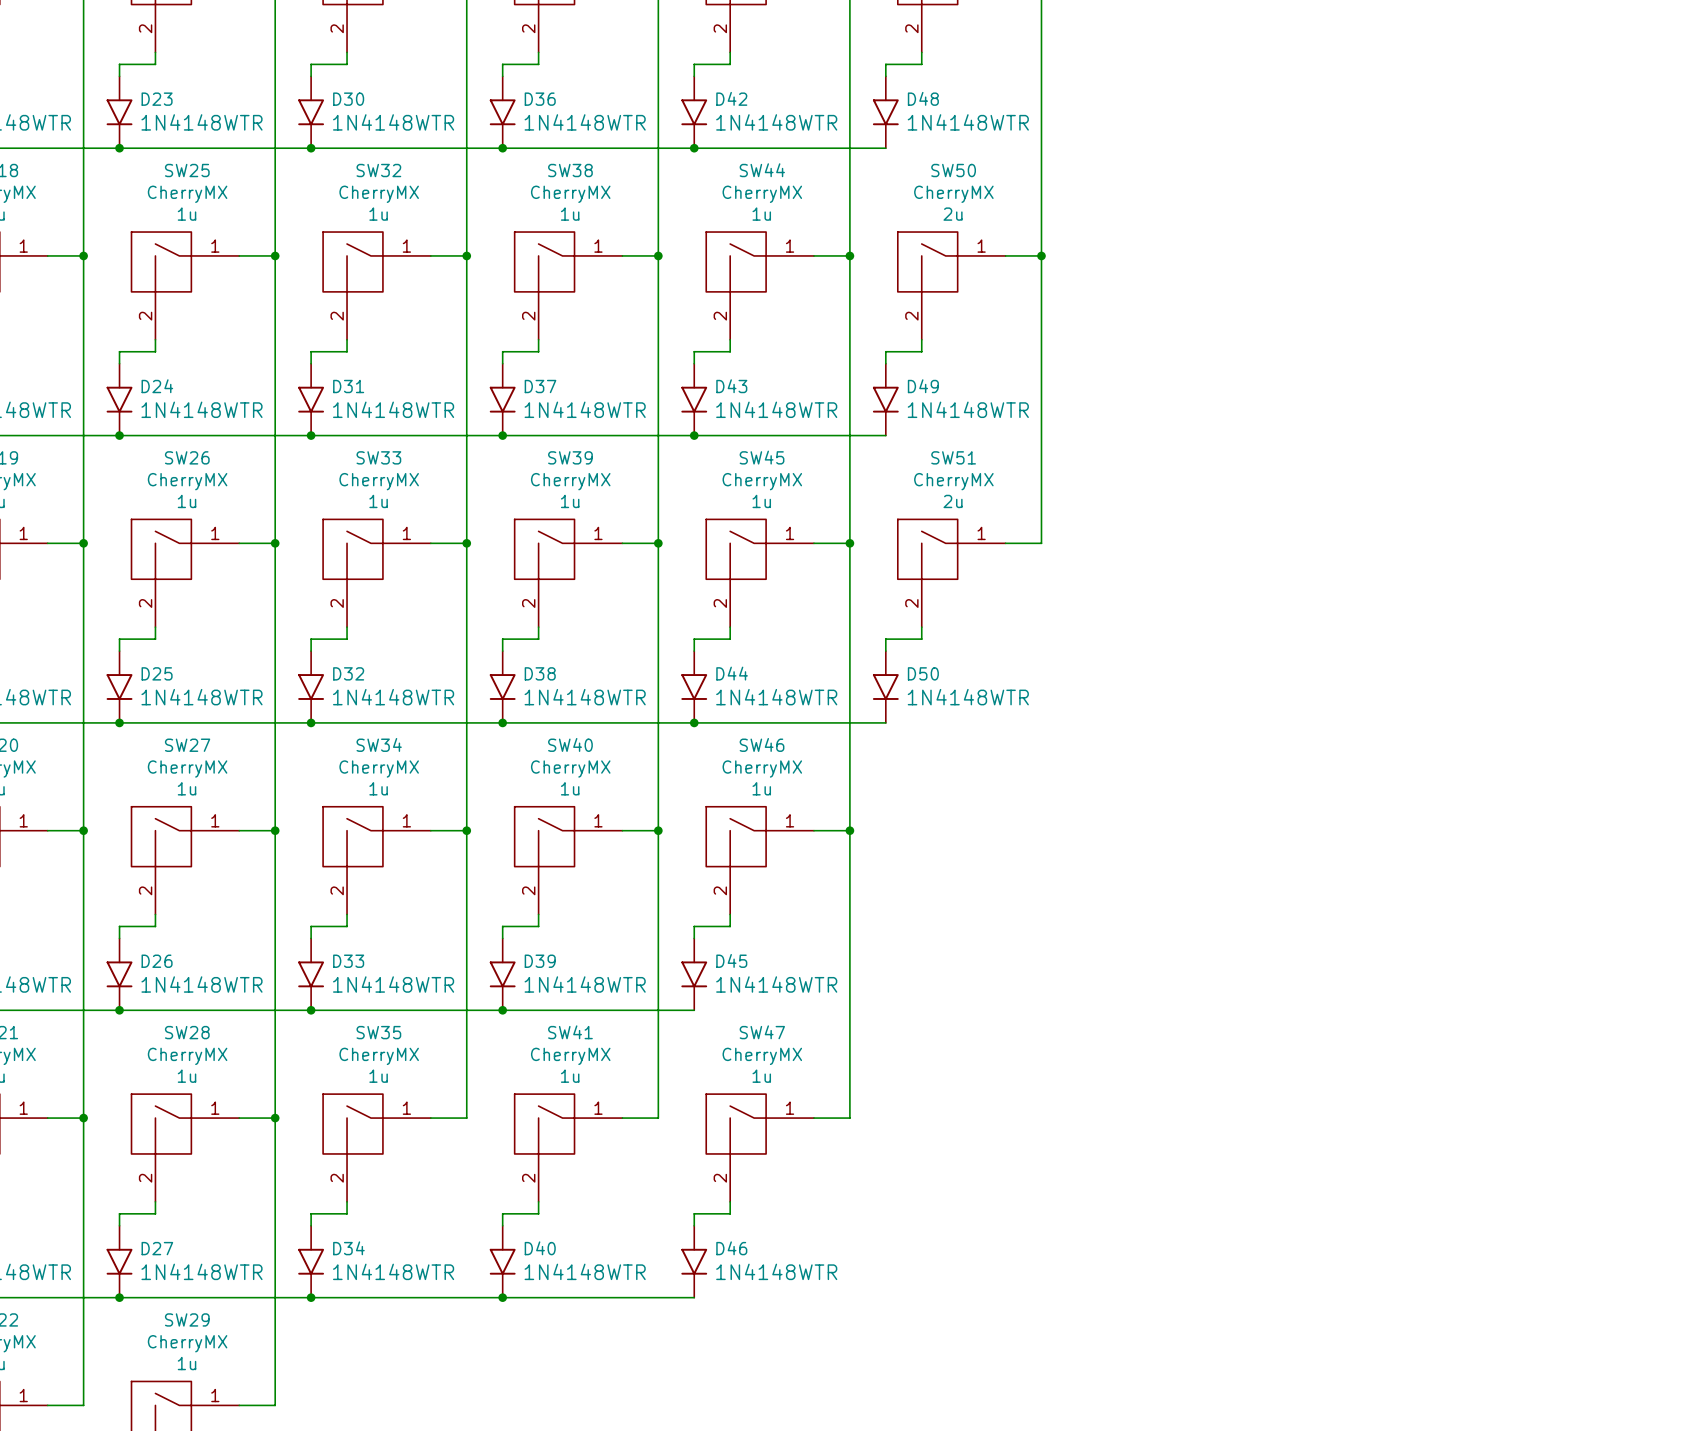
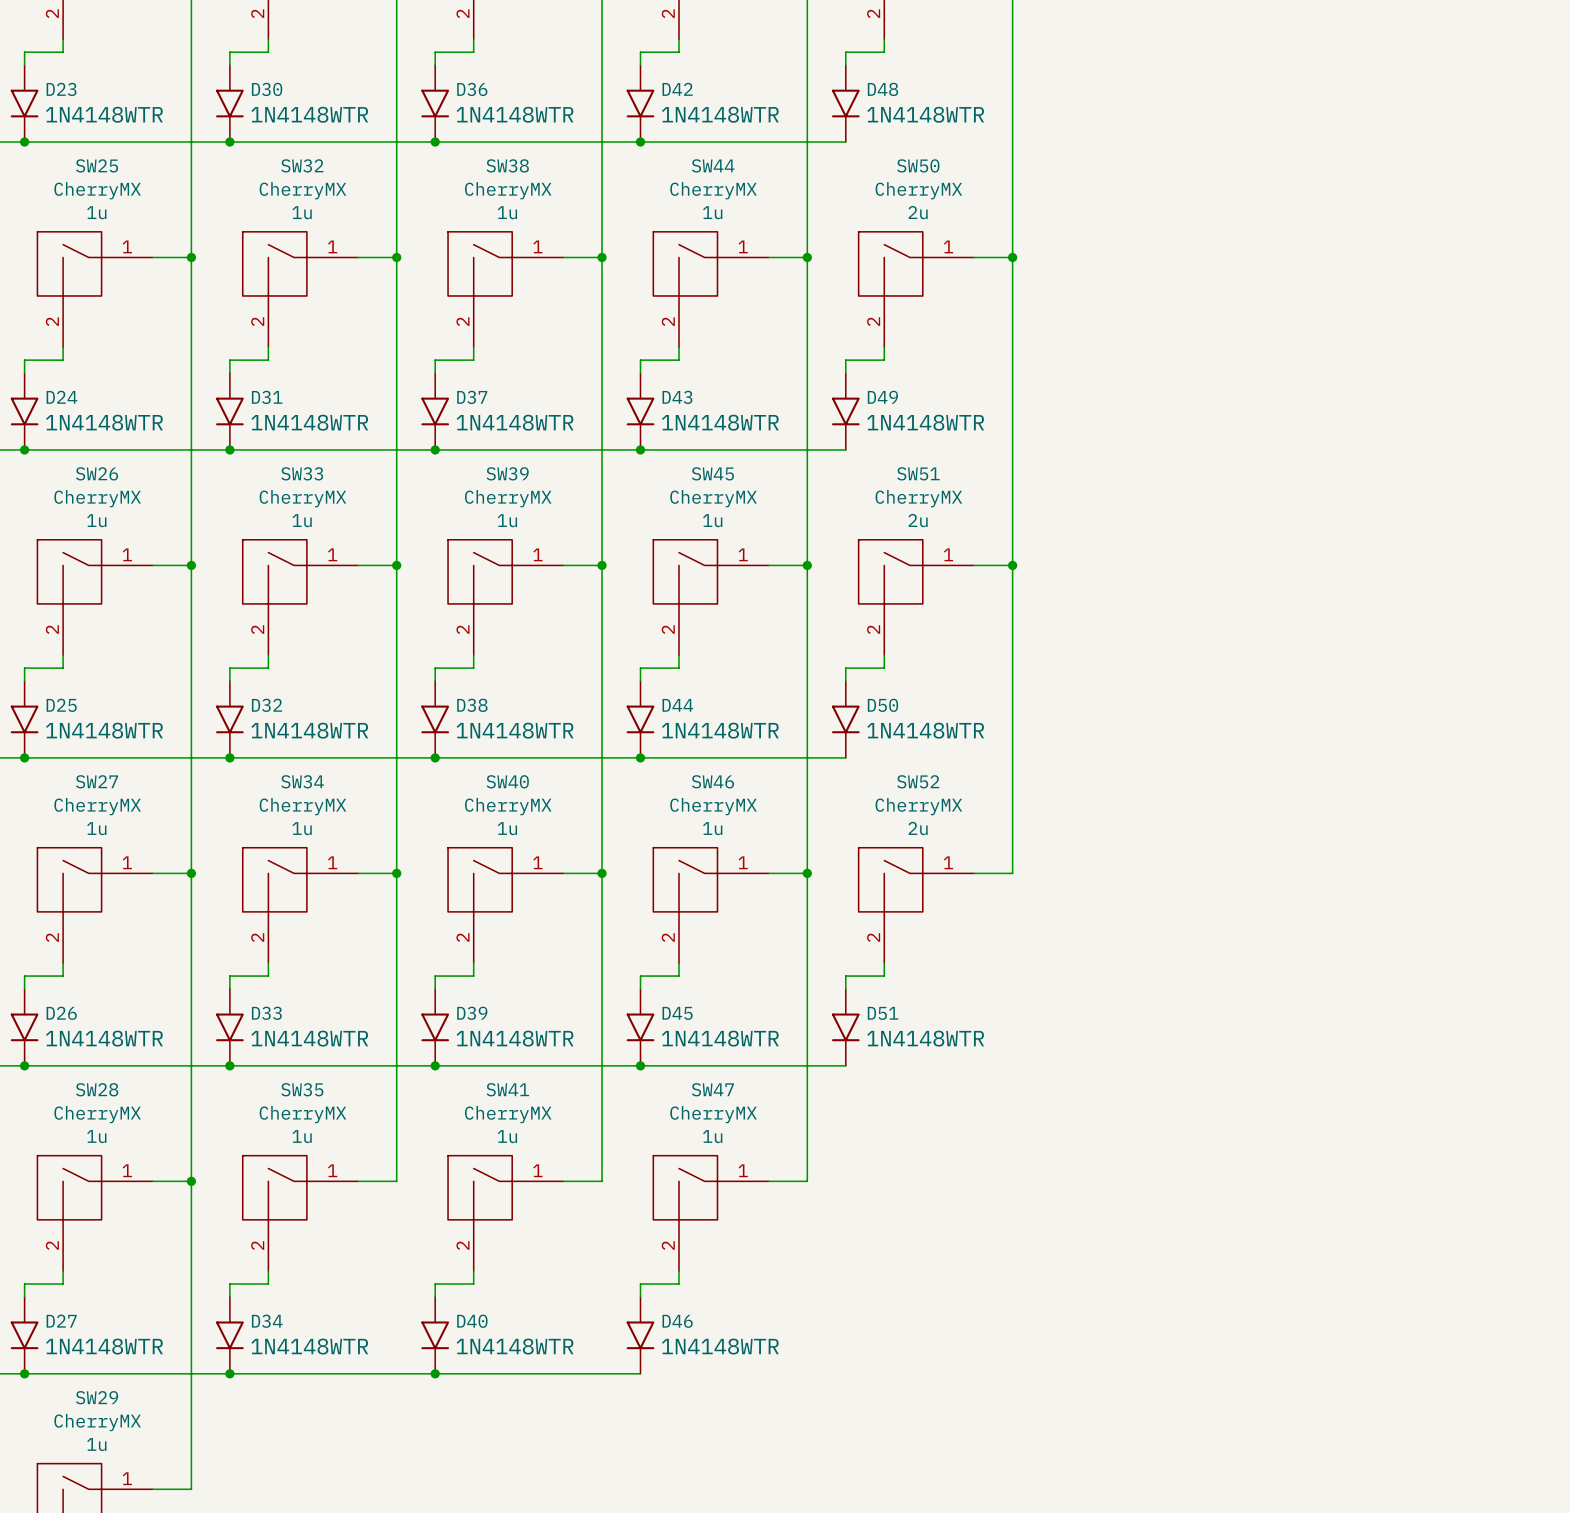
wire: none -> (1012, 565) (1012, 873) (974, 873)
junction: none -> (1012, 565)
SW52: none -> CherryMX (916, 905)
wire: none -> (884, 963) (884, 976) (845, 976) (845, 988)
D51: none -> (845, 1027)
wire: none -> (640, 1065) (845, 1065)
junction: none -> (640, 1065)

